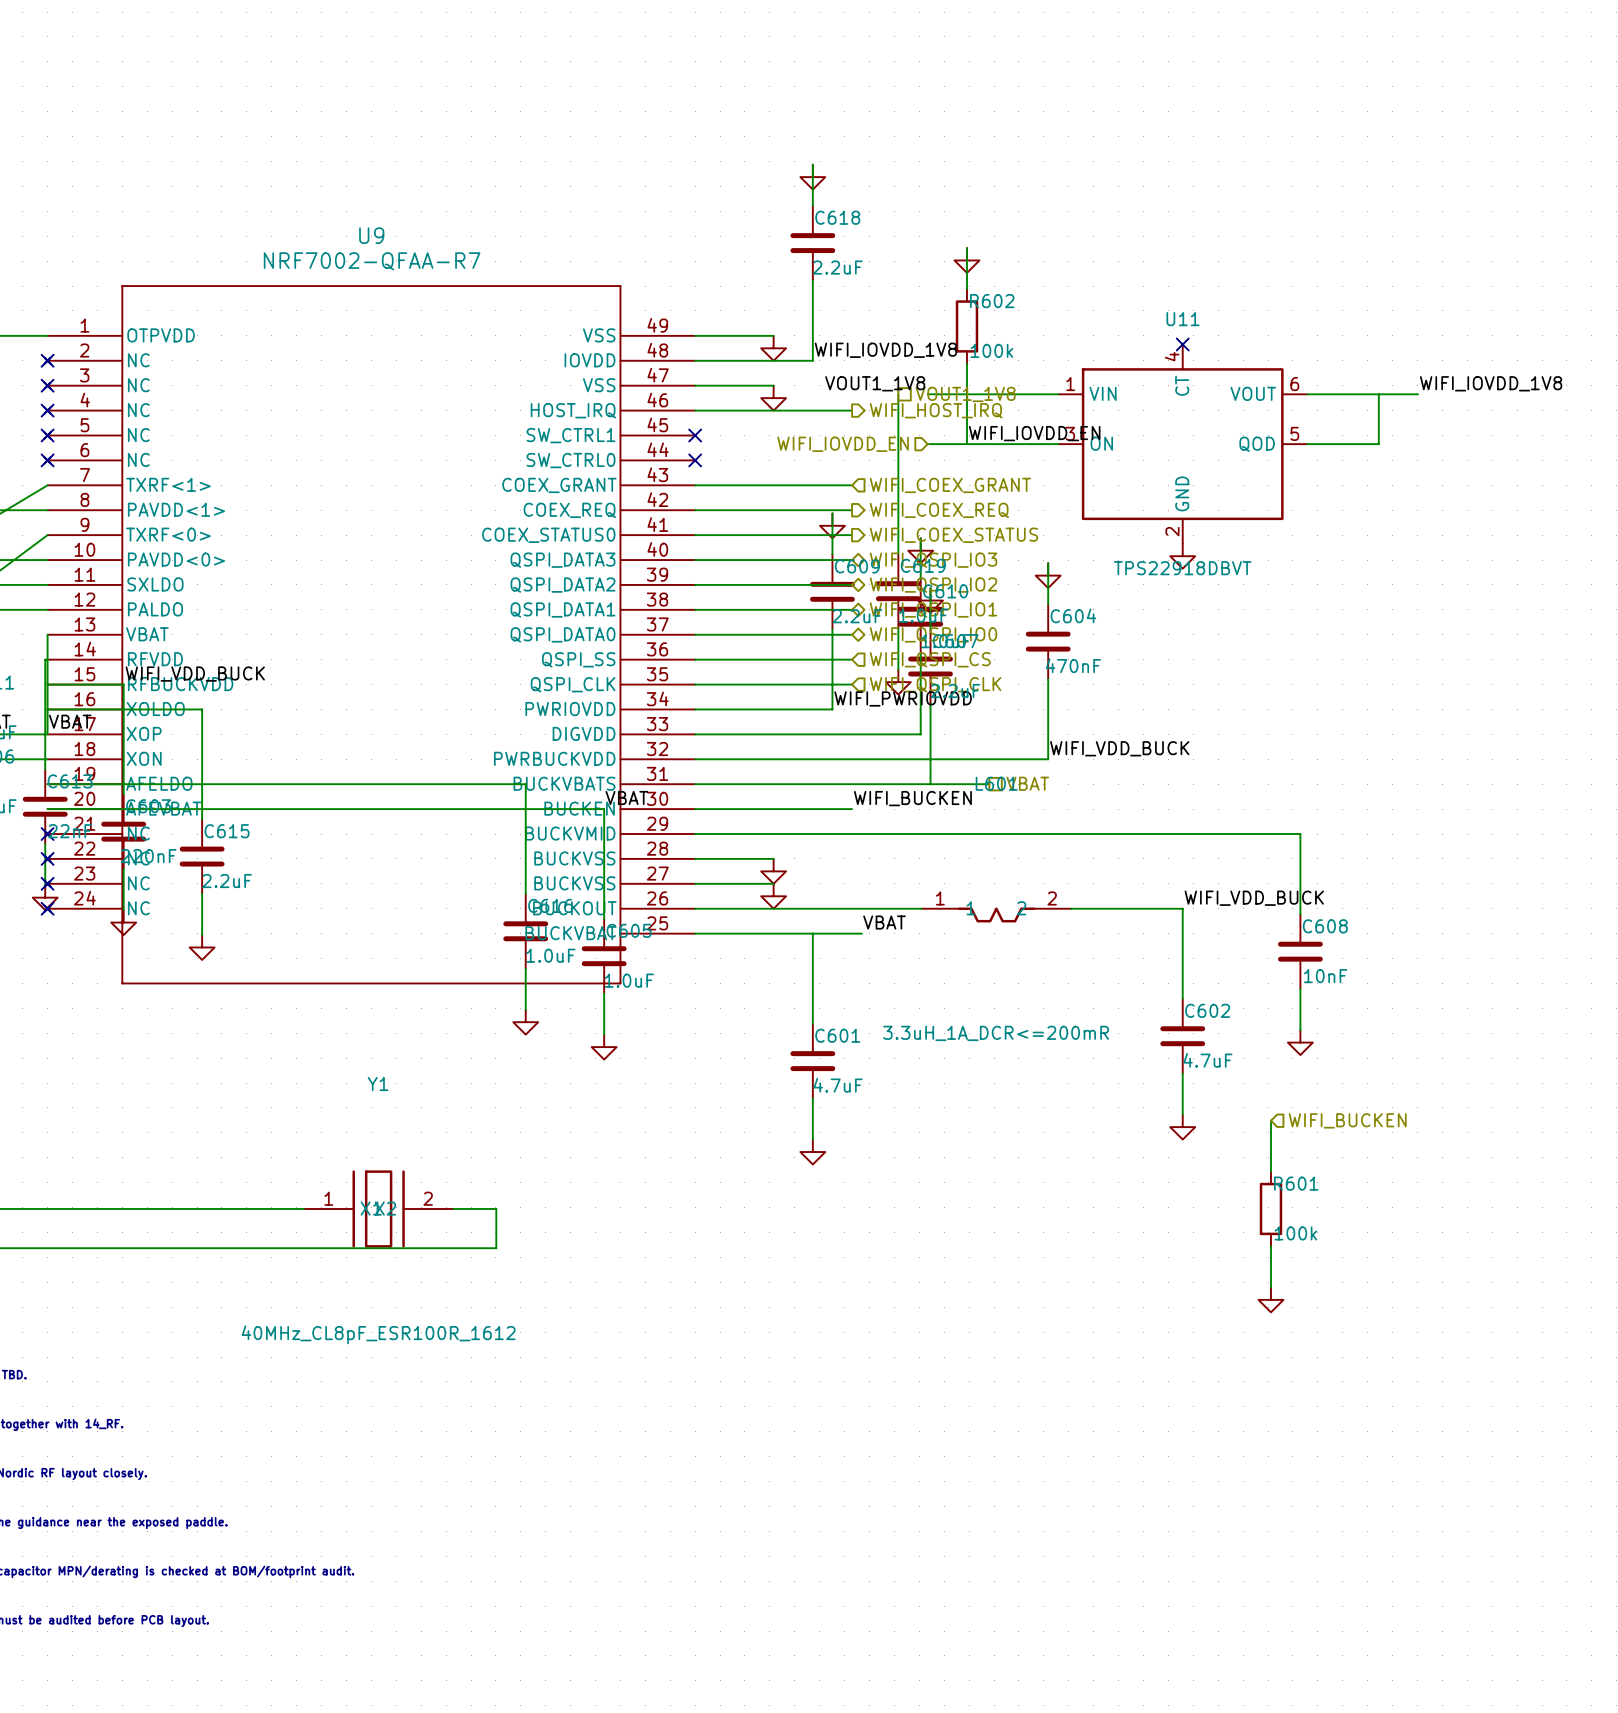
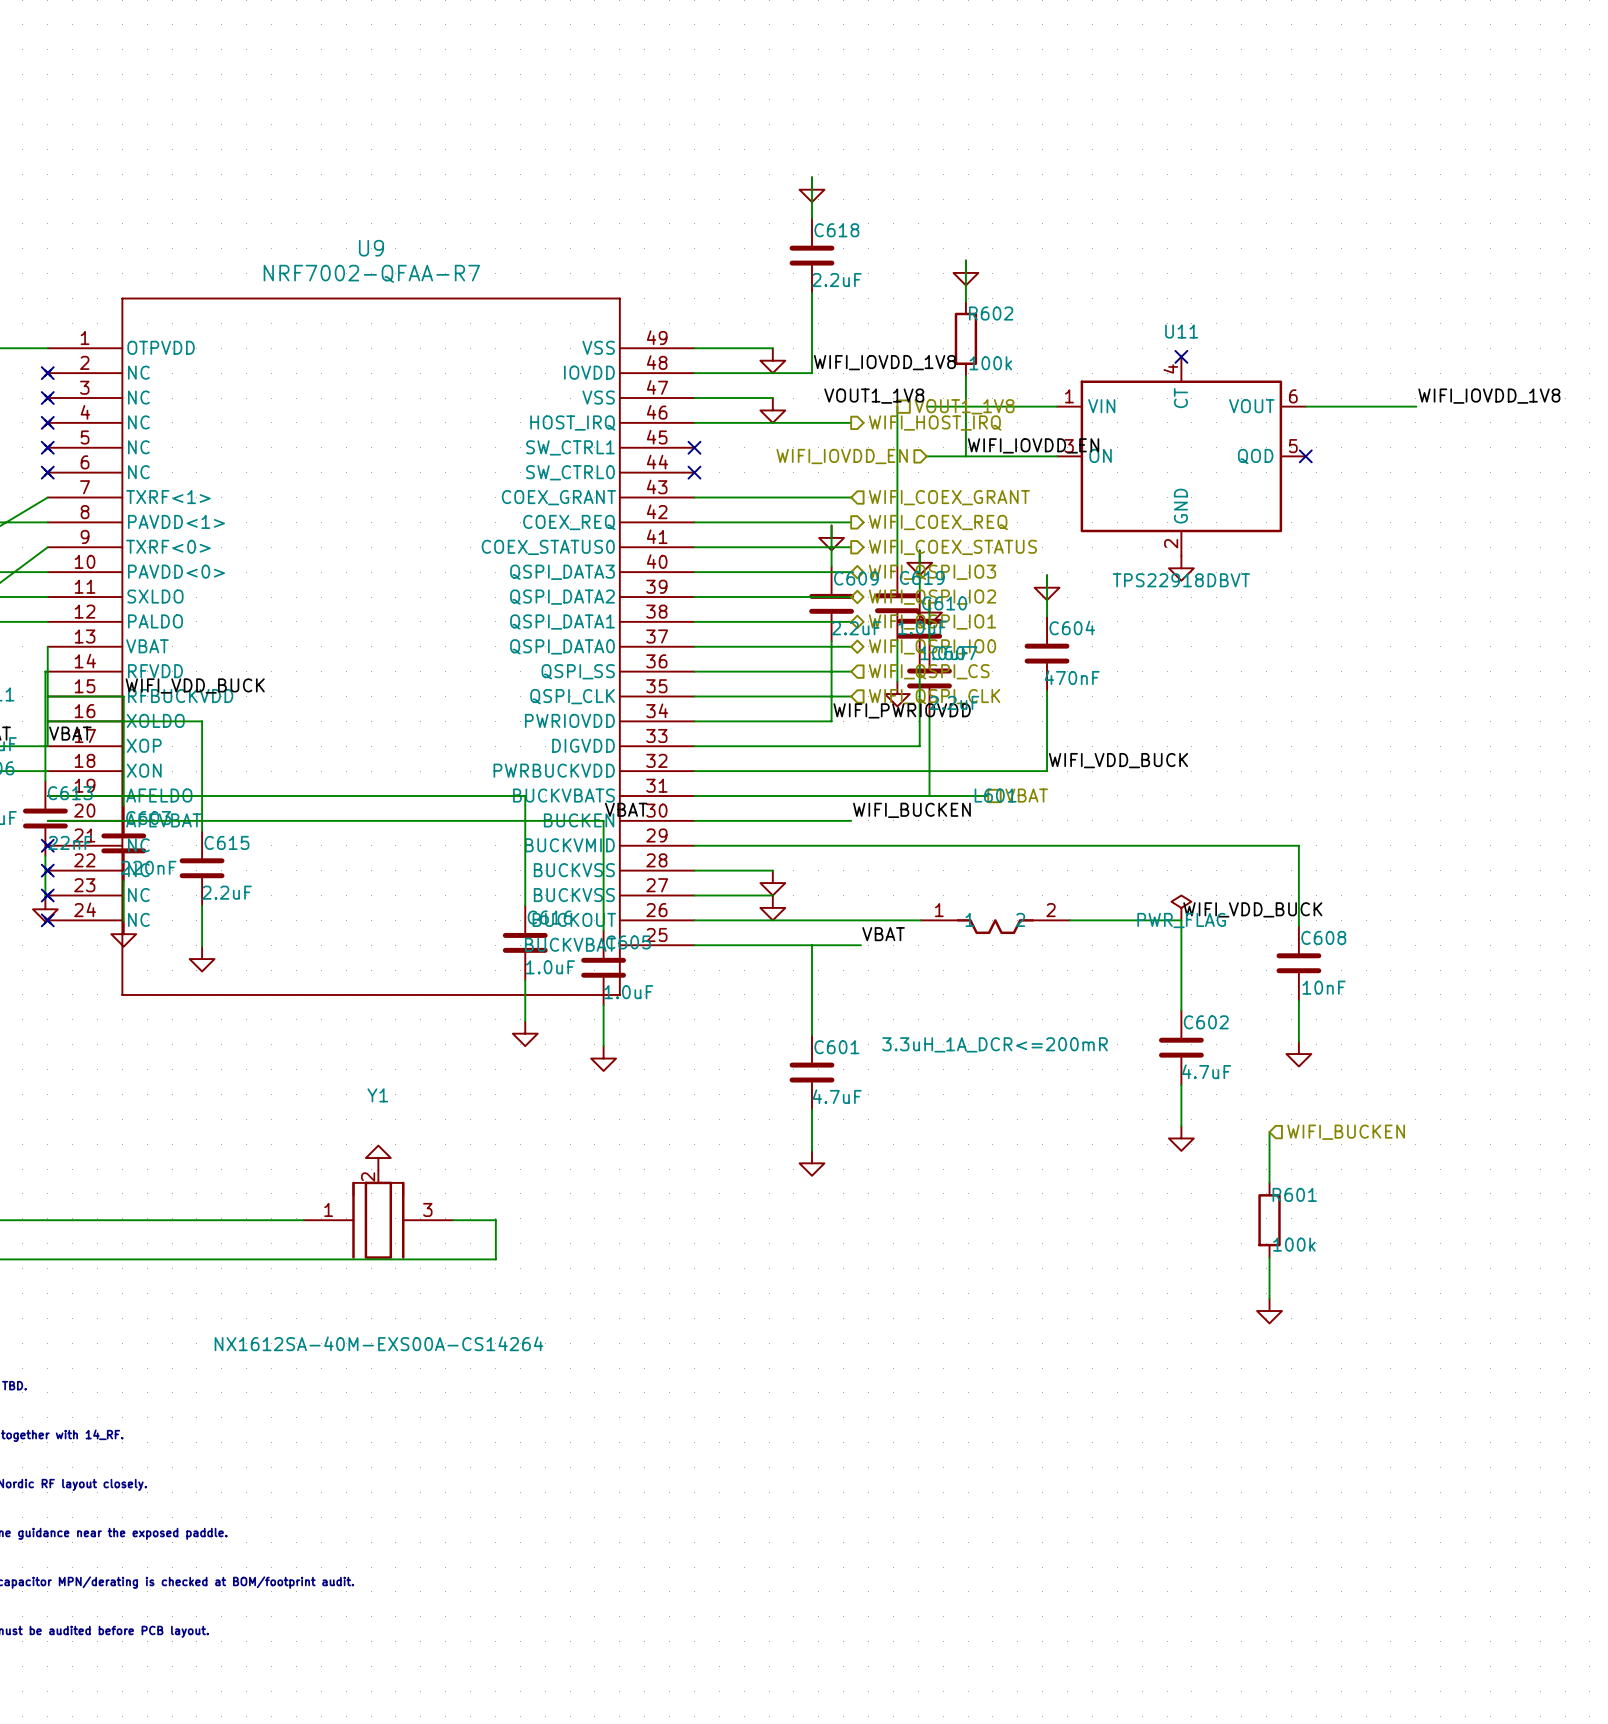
wire: (1378, 394) (1378, 444) (1307, 444) -> none
no-connect mark: none -> (1305, 456)
power symbol: none -> PWR_FLAG (1181, 907)
power symbol: none -> (378, 1158)
Y1 symbol: [303, 1170, 454, 1248] -> [303, 1170, 453, 1259]
Y1 value: 40MHz_CL8pF_ESR100R_1612 (378, 1334) -> NX1612SA-40M-EXS00A-CS14264 (378, 1343)

